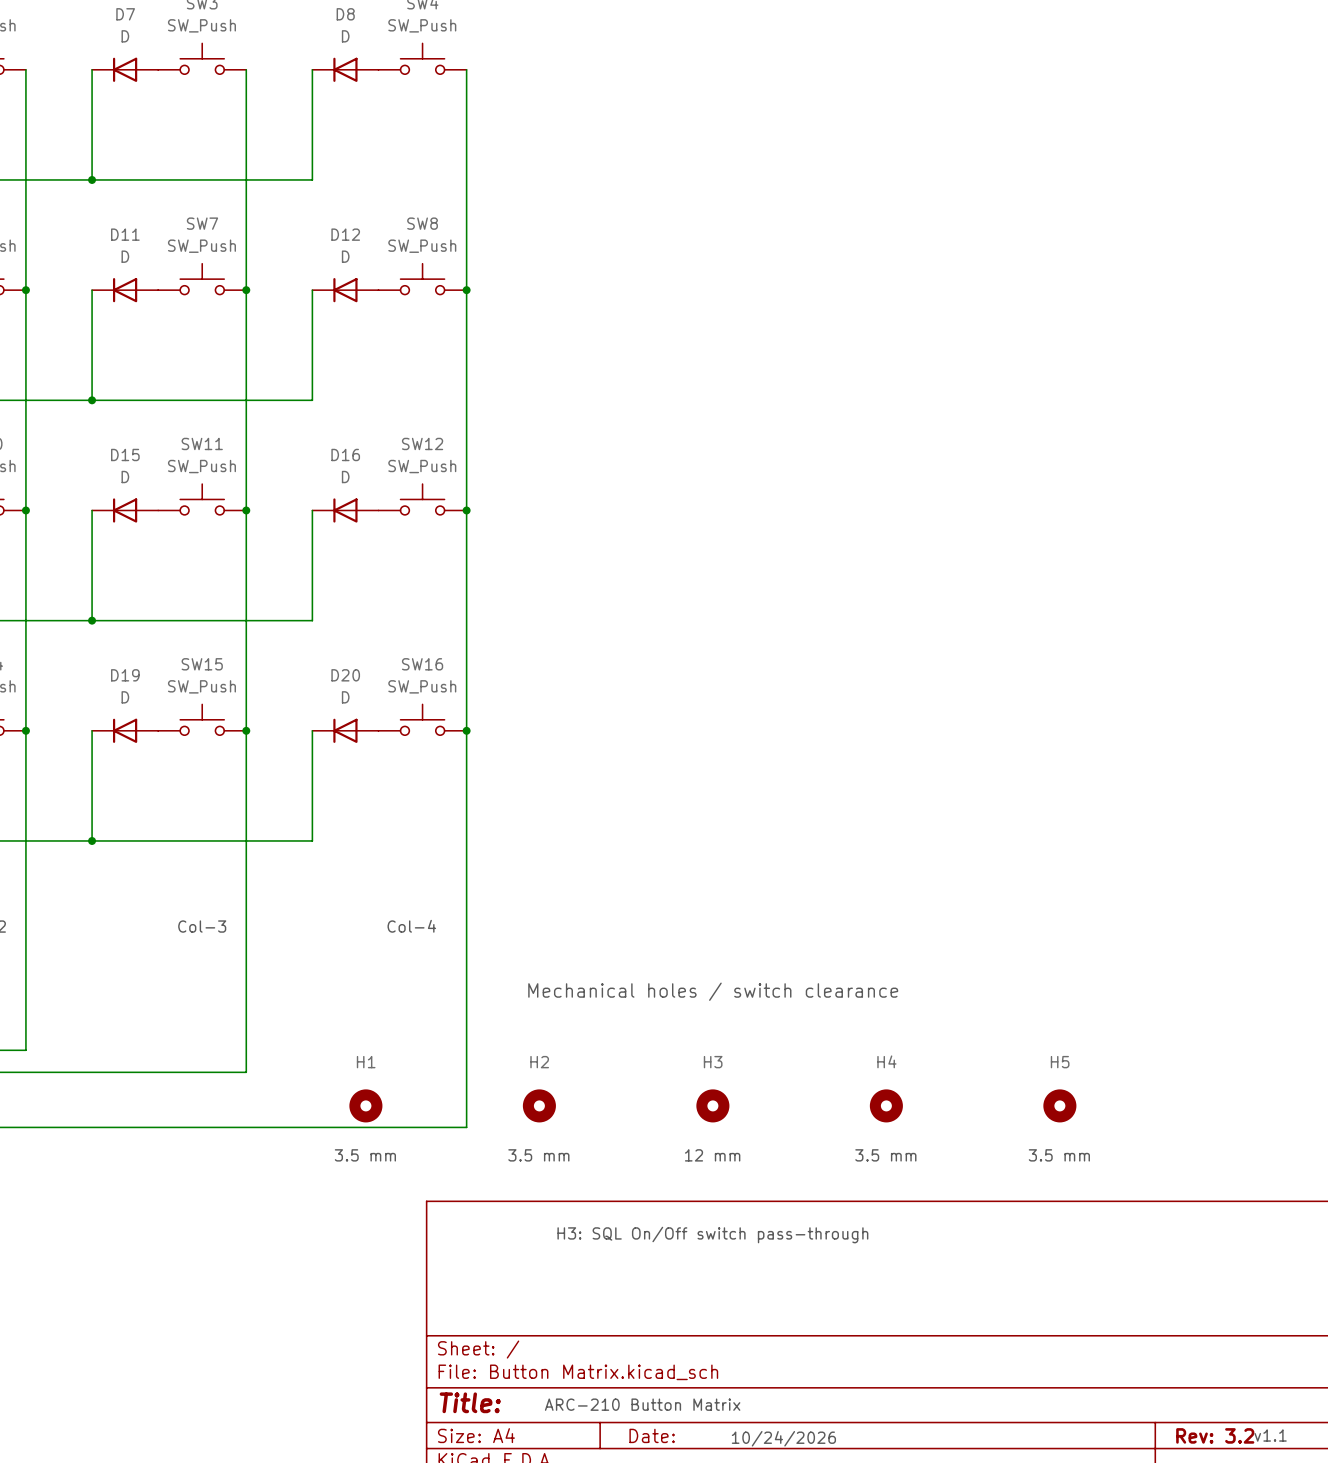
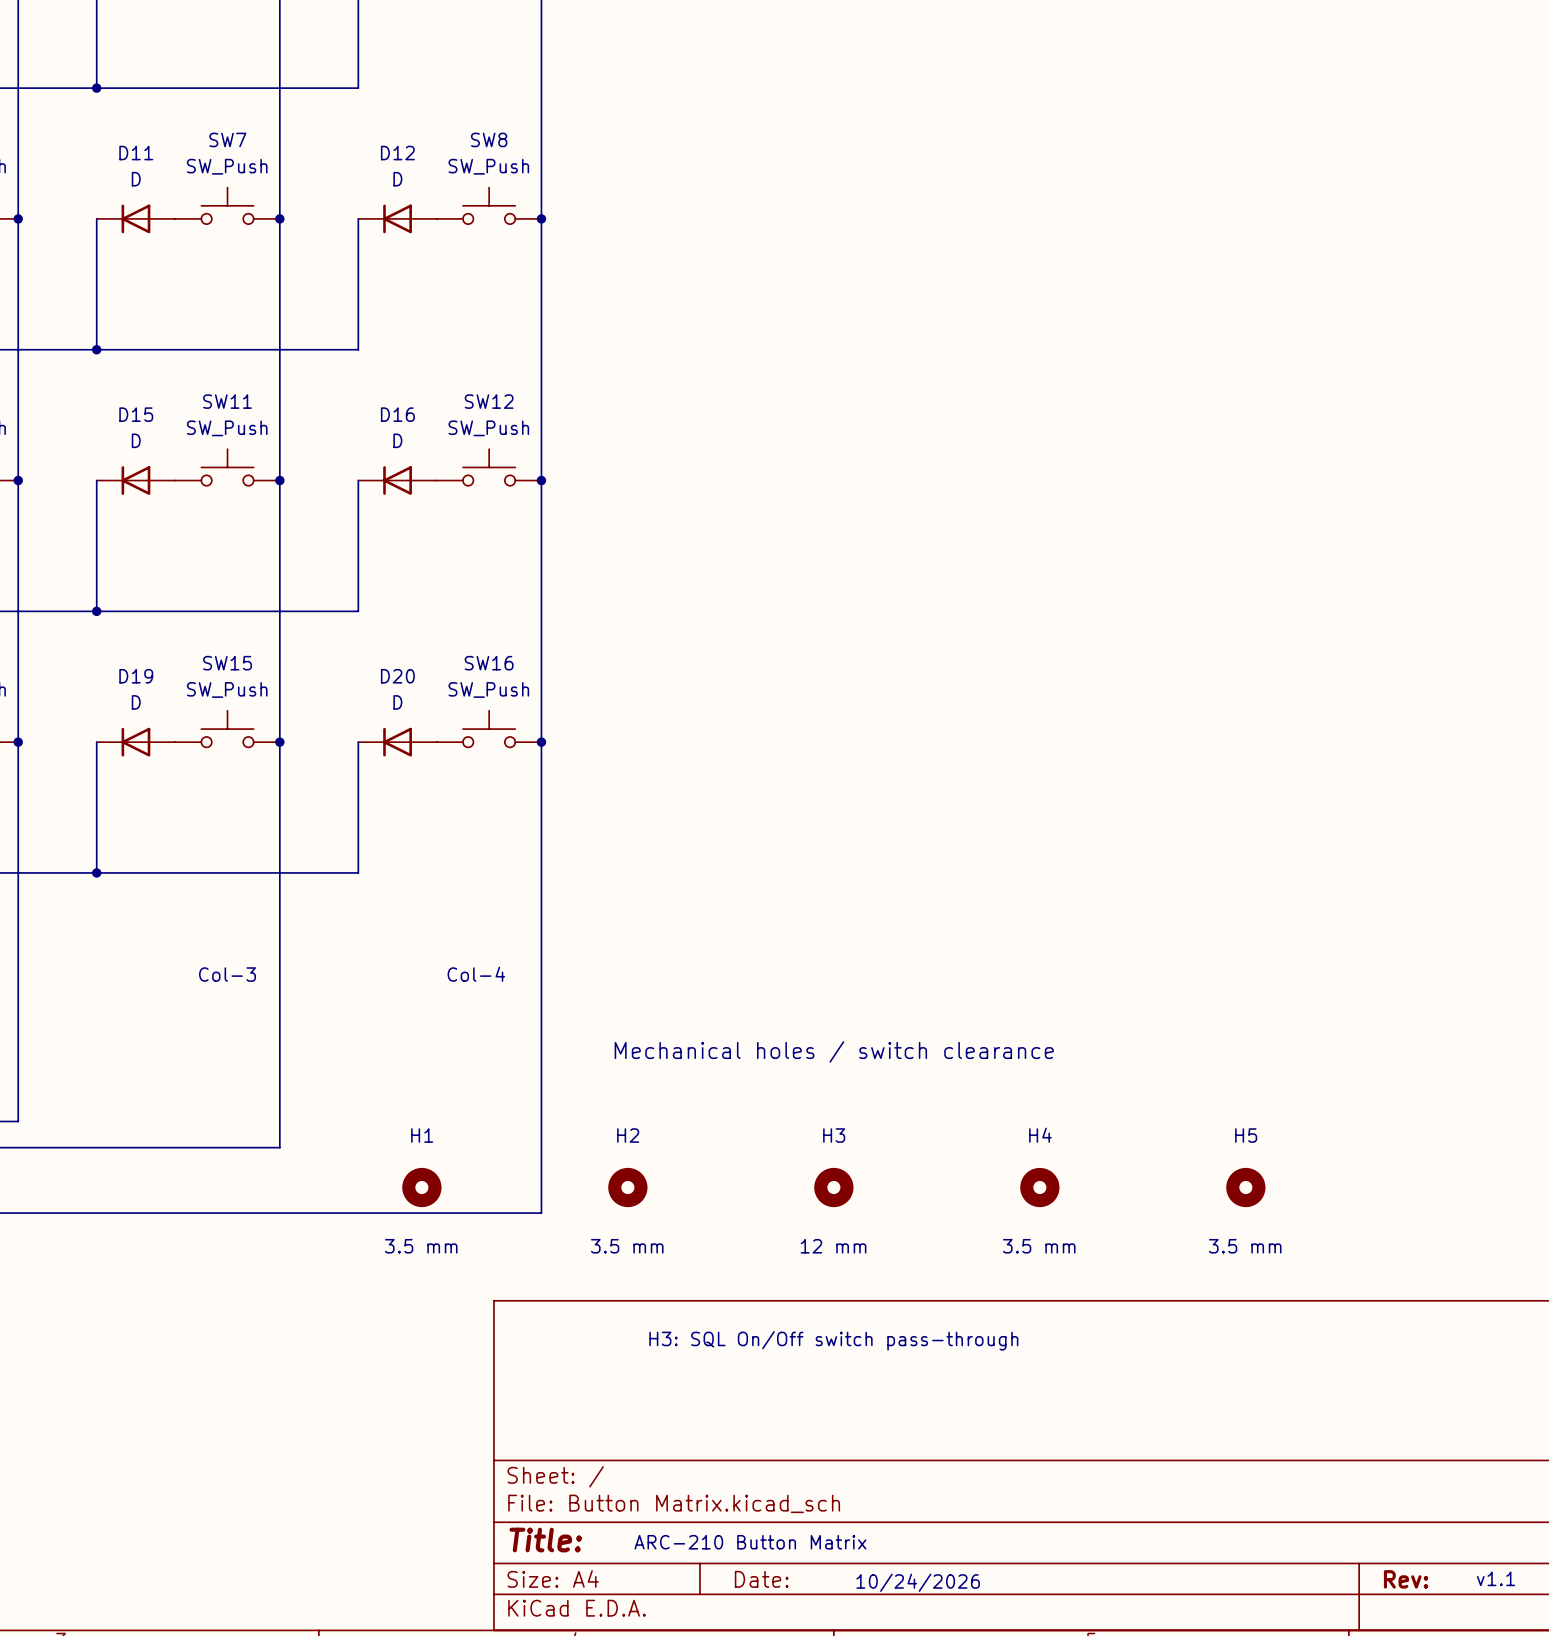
title block: Rev: 3.2 (1215, 1435) -> Rev: (1406, 1579)

